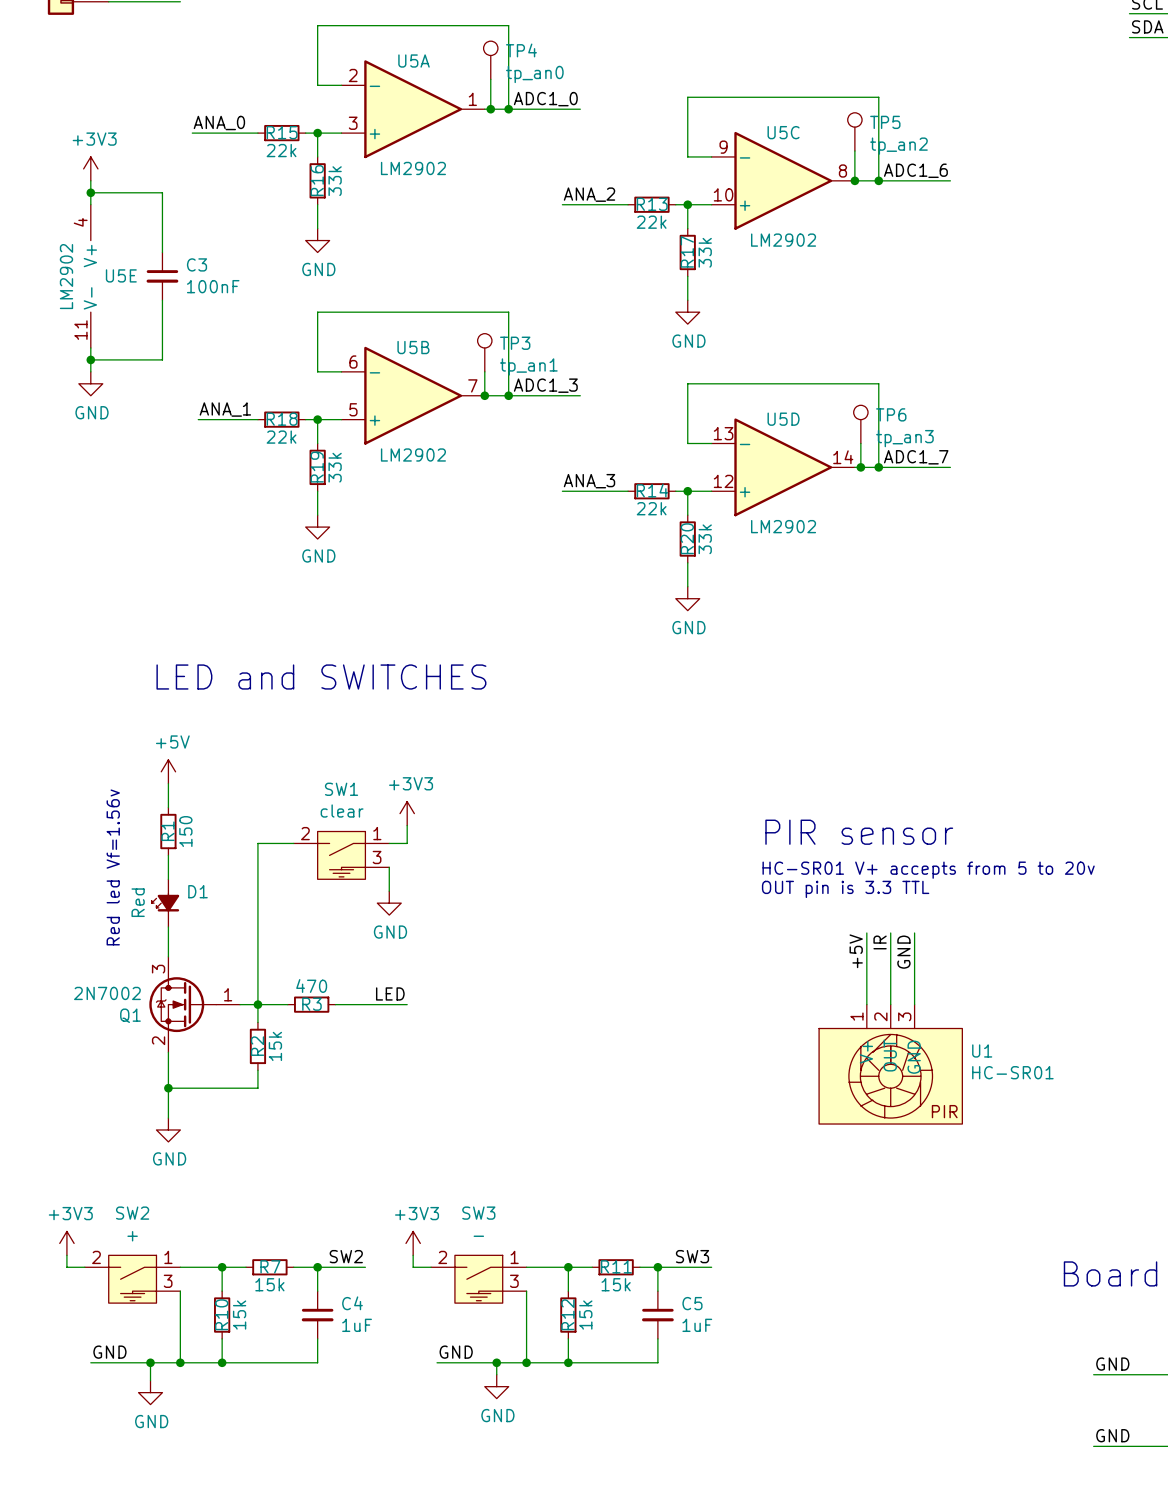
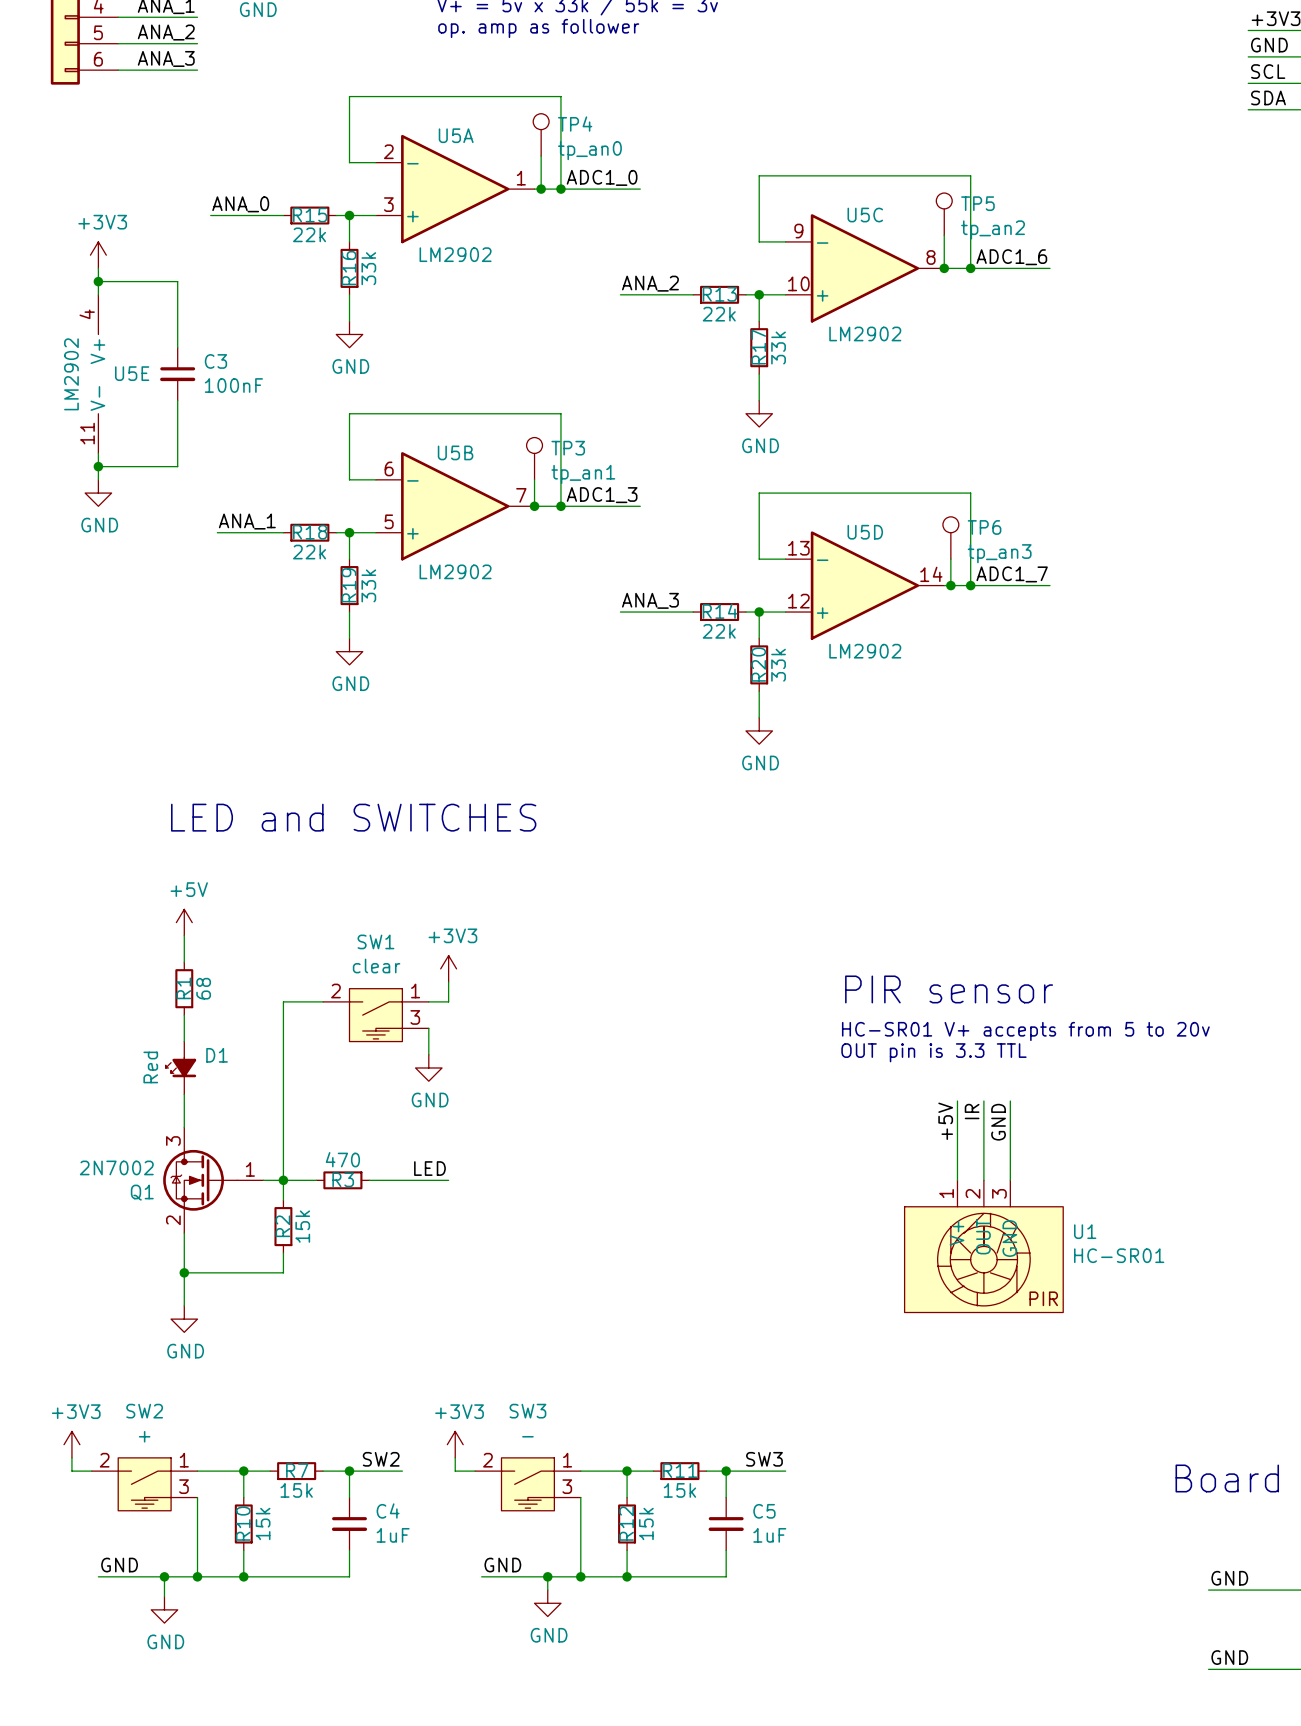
R1 value: 150 (185, 831) -> 68 (203, 988)
text: Red led Vf=1.56v (113, 867) -> none

